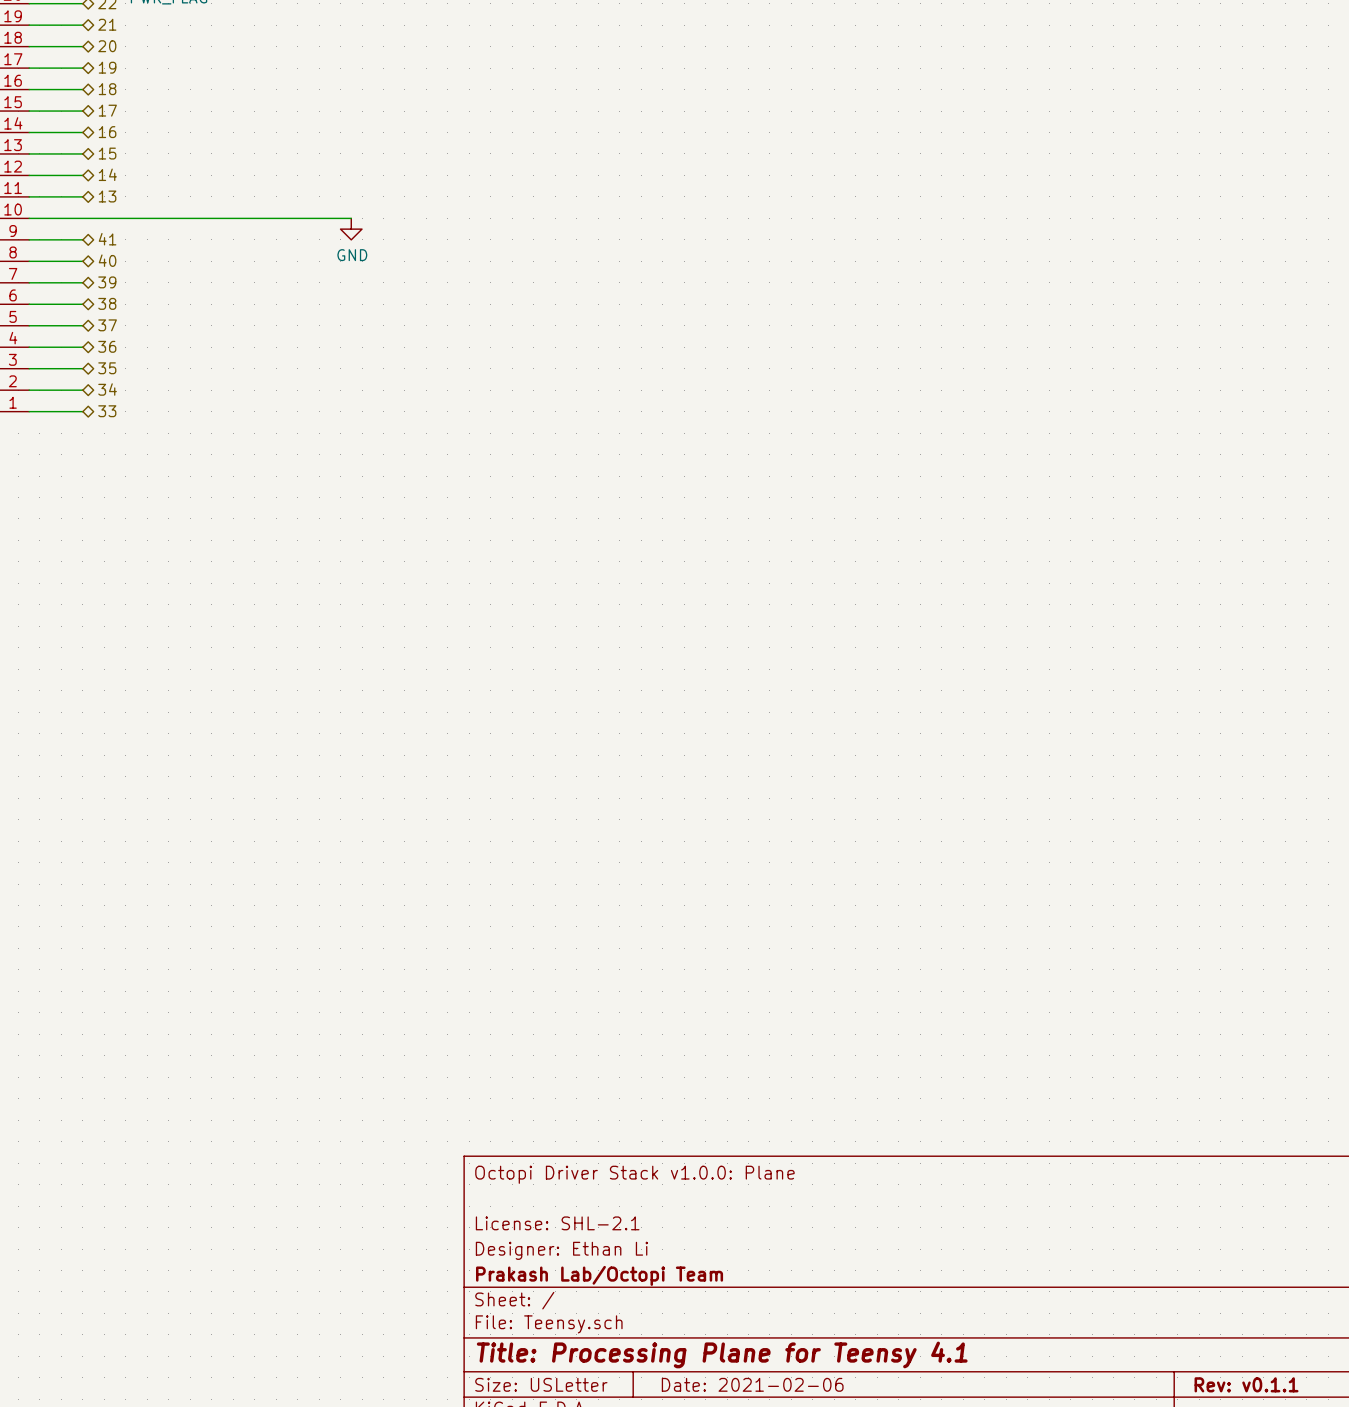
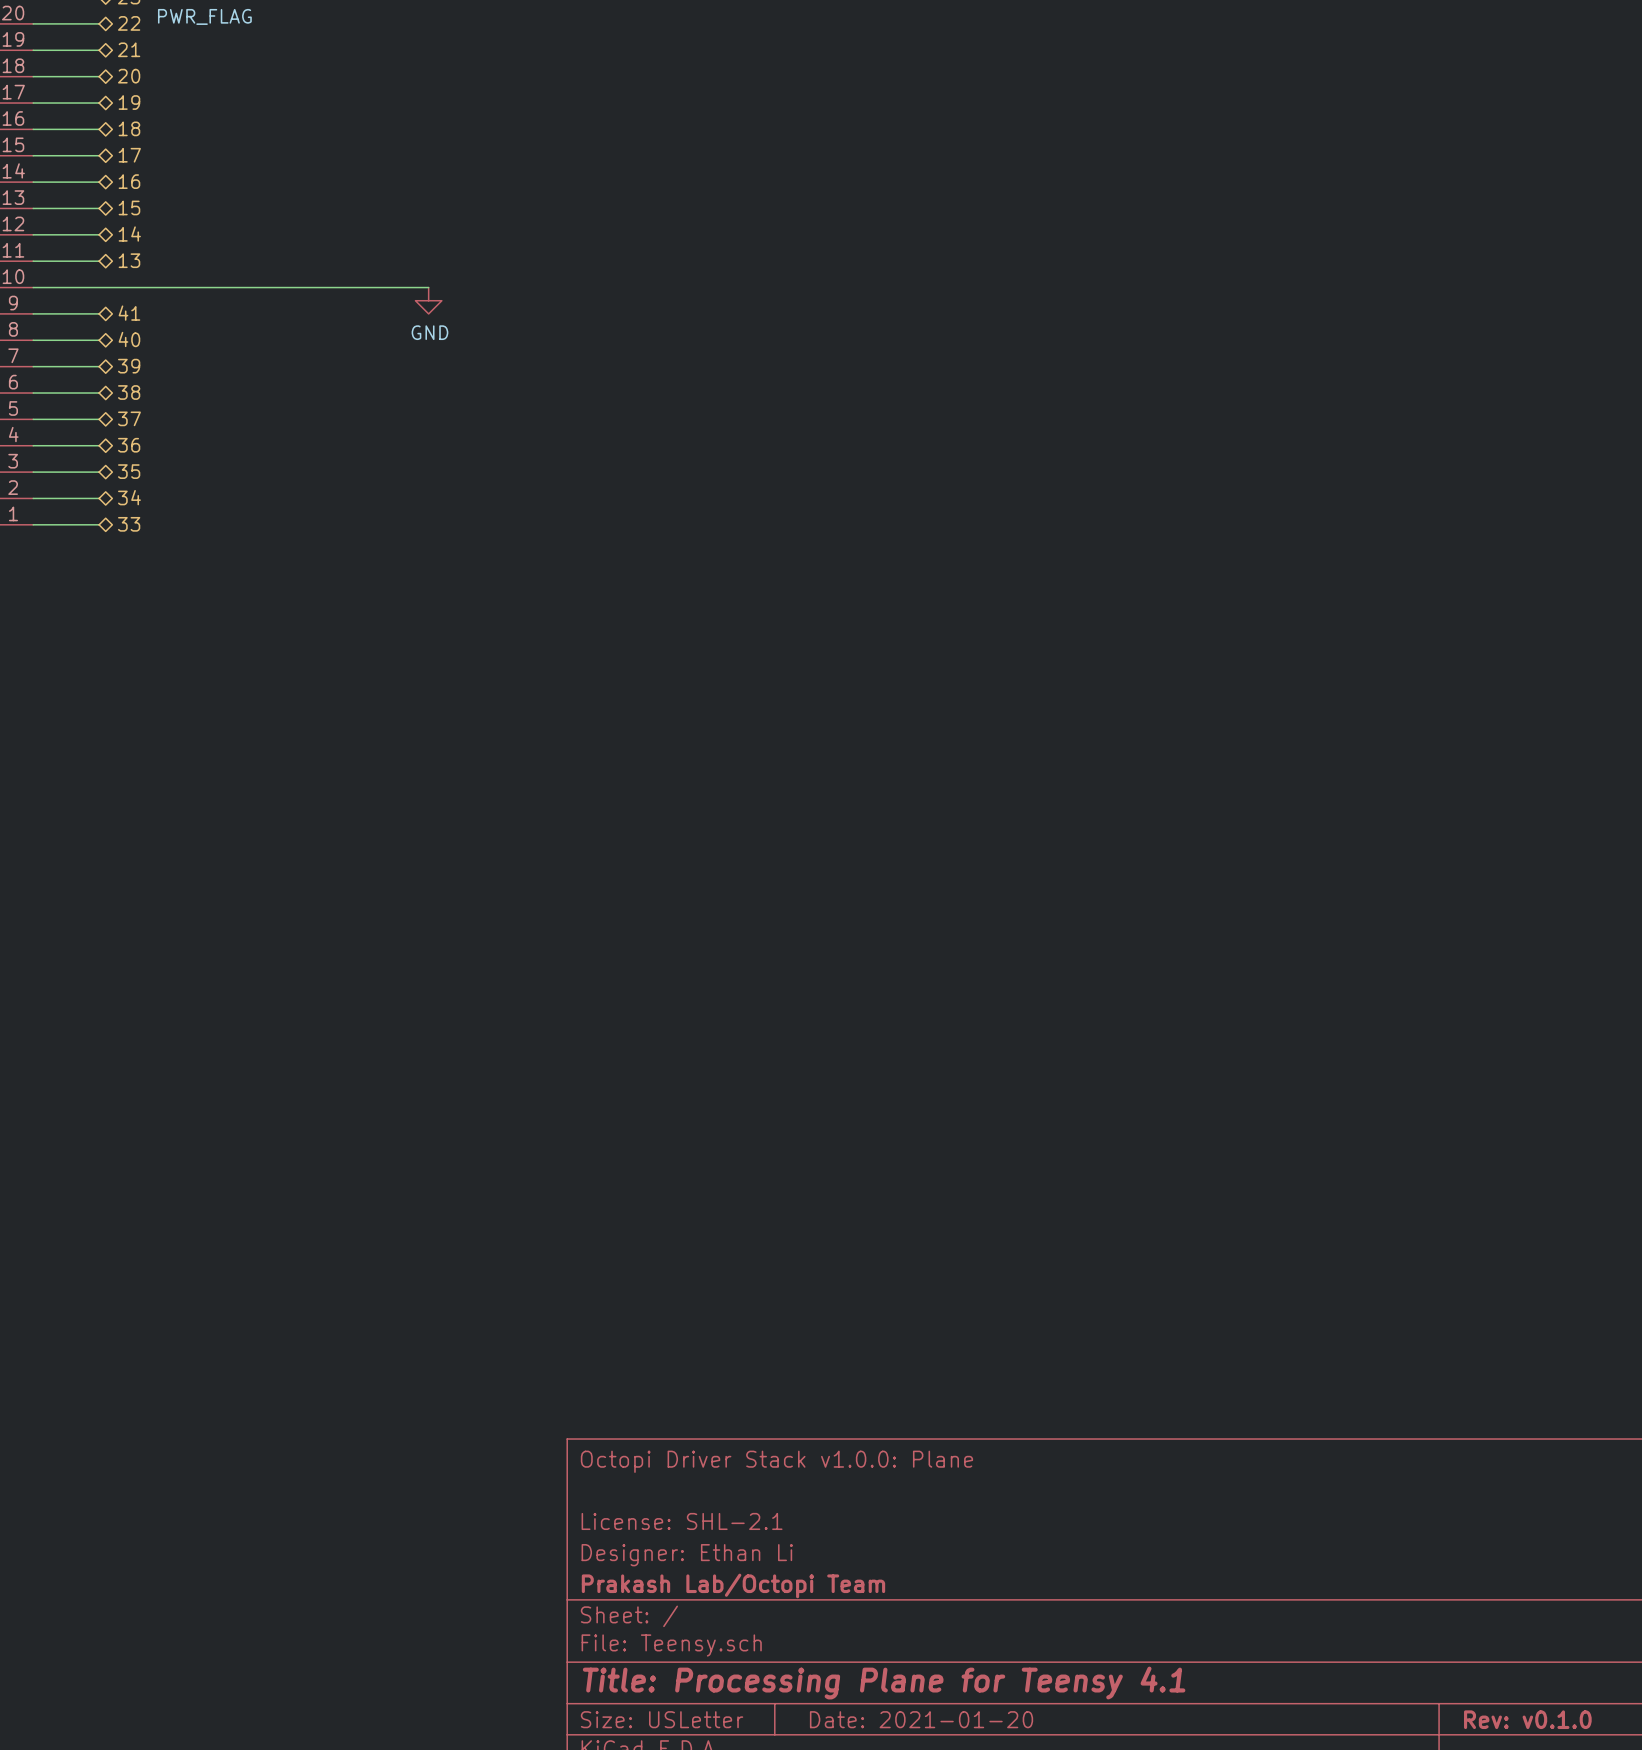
title block: Date: 2021-02-06 (752, 1384) -> Date: 2021-01-20 (921, 1719)
title block: Rev: v0.1.1 (1246, 1384) -> Rev: v0.1.0 (1527, 1719)

